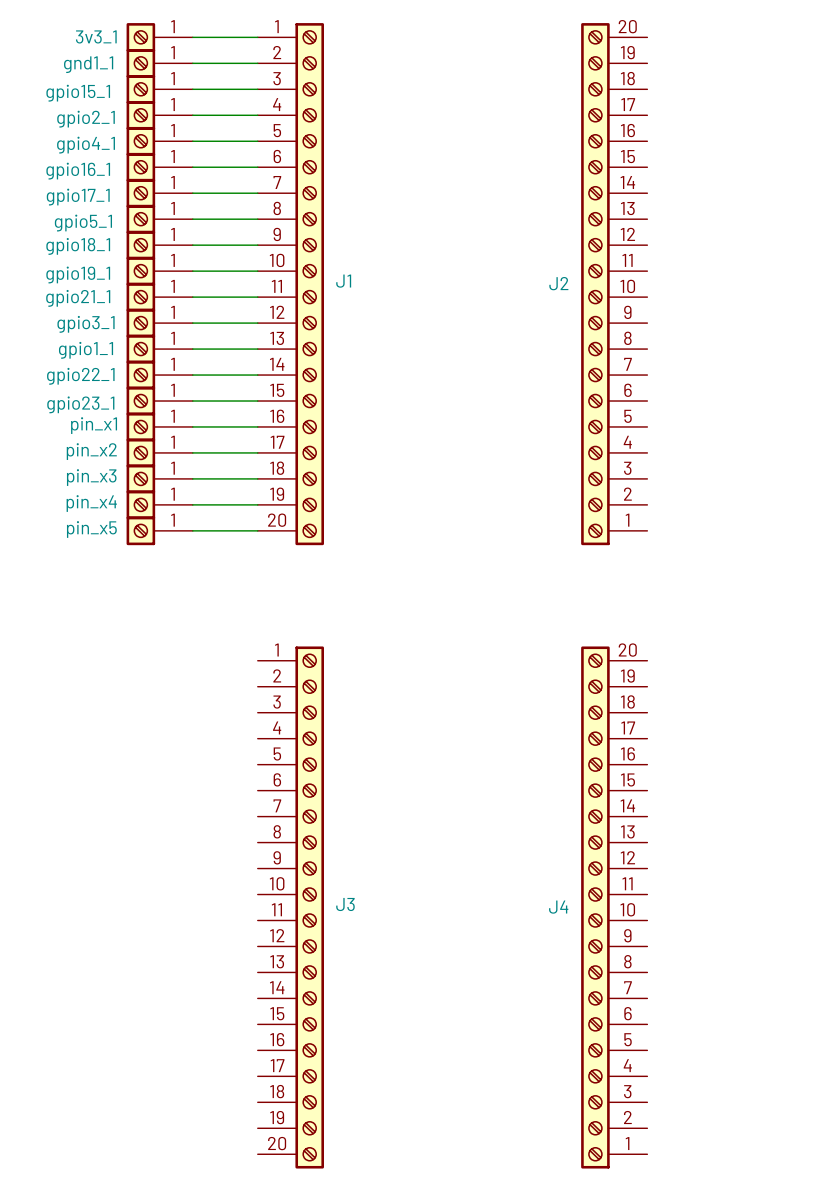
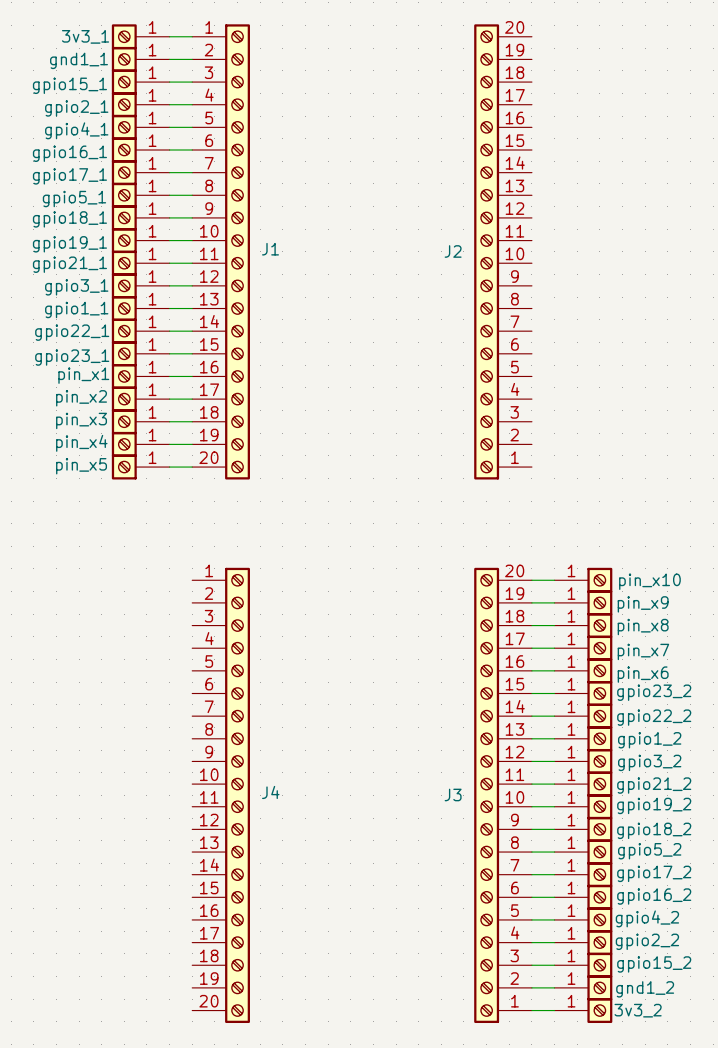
J1 position: (290, 284) -> (221, 251)
J2 position: (614, 284) -> (503, 251)
pin_x10: none -> (583, 580)
pin_x9: none -> (583, 602)
pin_x8: none -> (583, 625)
pin_x7: none -> (583, 648)
pin_x6: none -> (583, 670)
gpio23_2: none -> (583, 693)
gpio22_2: none -> (583, 716)
gpio1_2: none -> (583, 738)
gpio3_2: none -> (583, 761)
gpio21_2: none -> (583, 784)
J3 rotation: 0° (309, 907) -> 180° (486, 795)
J4 rotation: 0° (595, 907) -> 180° (237, 795)
J4 position: (614, 907) -> (221, 795)
gpio19_2: none -> (583, 806)
gpio18_2: none -> (583, 829)
gpio5_2: none -> (583, 852)
gpio17_2: none -> (583, 874)
gpio16_2: none -> (583, 897)
gpio4_2: none -> (583, 919)
gpio2_2: none -> (583, 942)
gpio15_2: none -> (583, 965)
gnd1_2: none -> (583, 987)
3v3_2: none -> (583, 1010)

